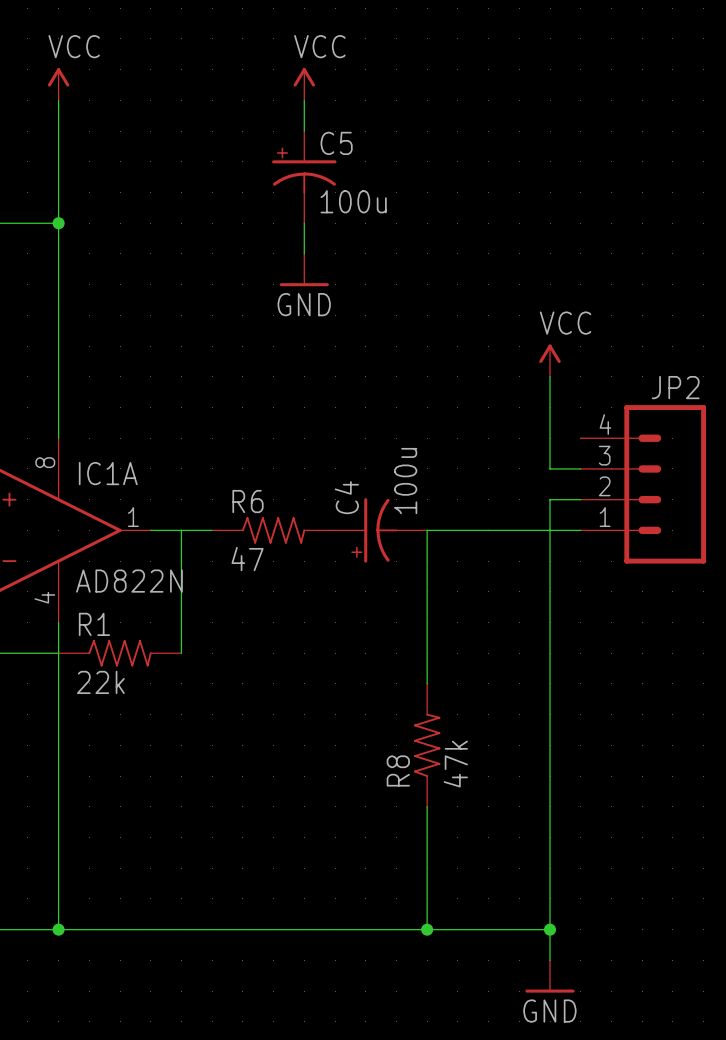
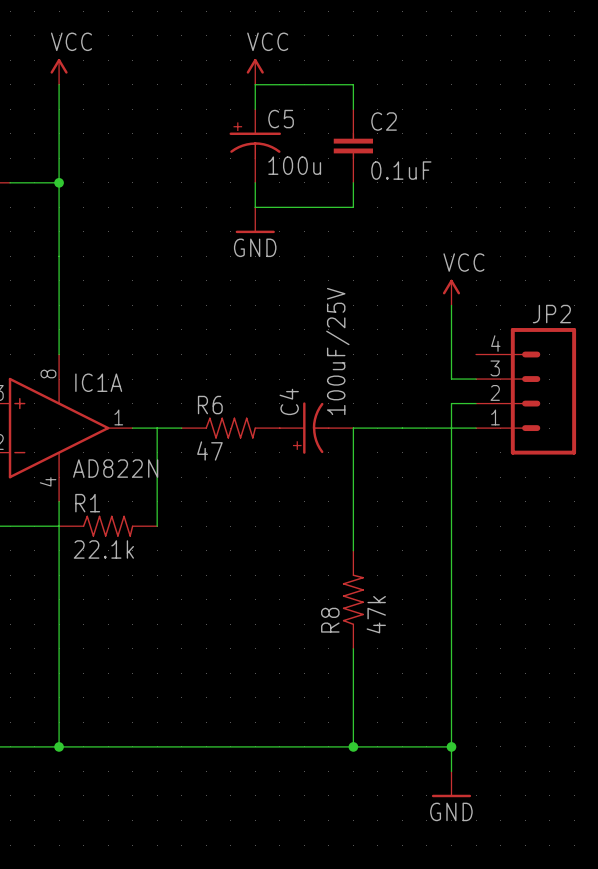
wire: none -> (255, 84) (353, 84) (353, 109)
C2: none -> 0.1uF (353, 146)
wire: none -> (353, 182) (353, 207) (255, 207)
C4 value: 100u (405, 481) -> 100uF/25V (337, 351)
R1 value: 22k (100, 682) -> 22.1k (103, 549)

